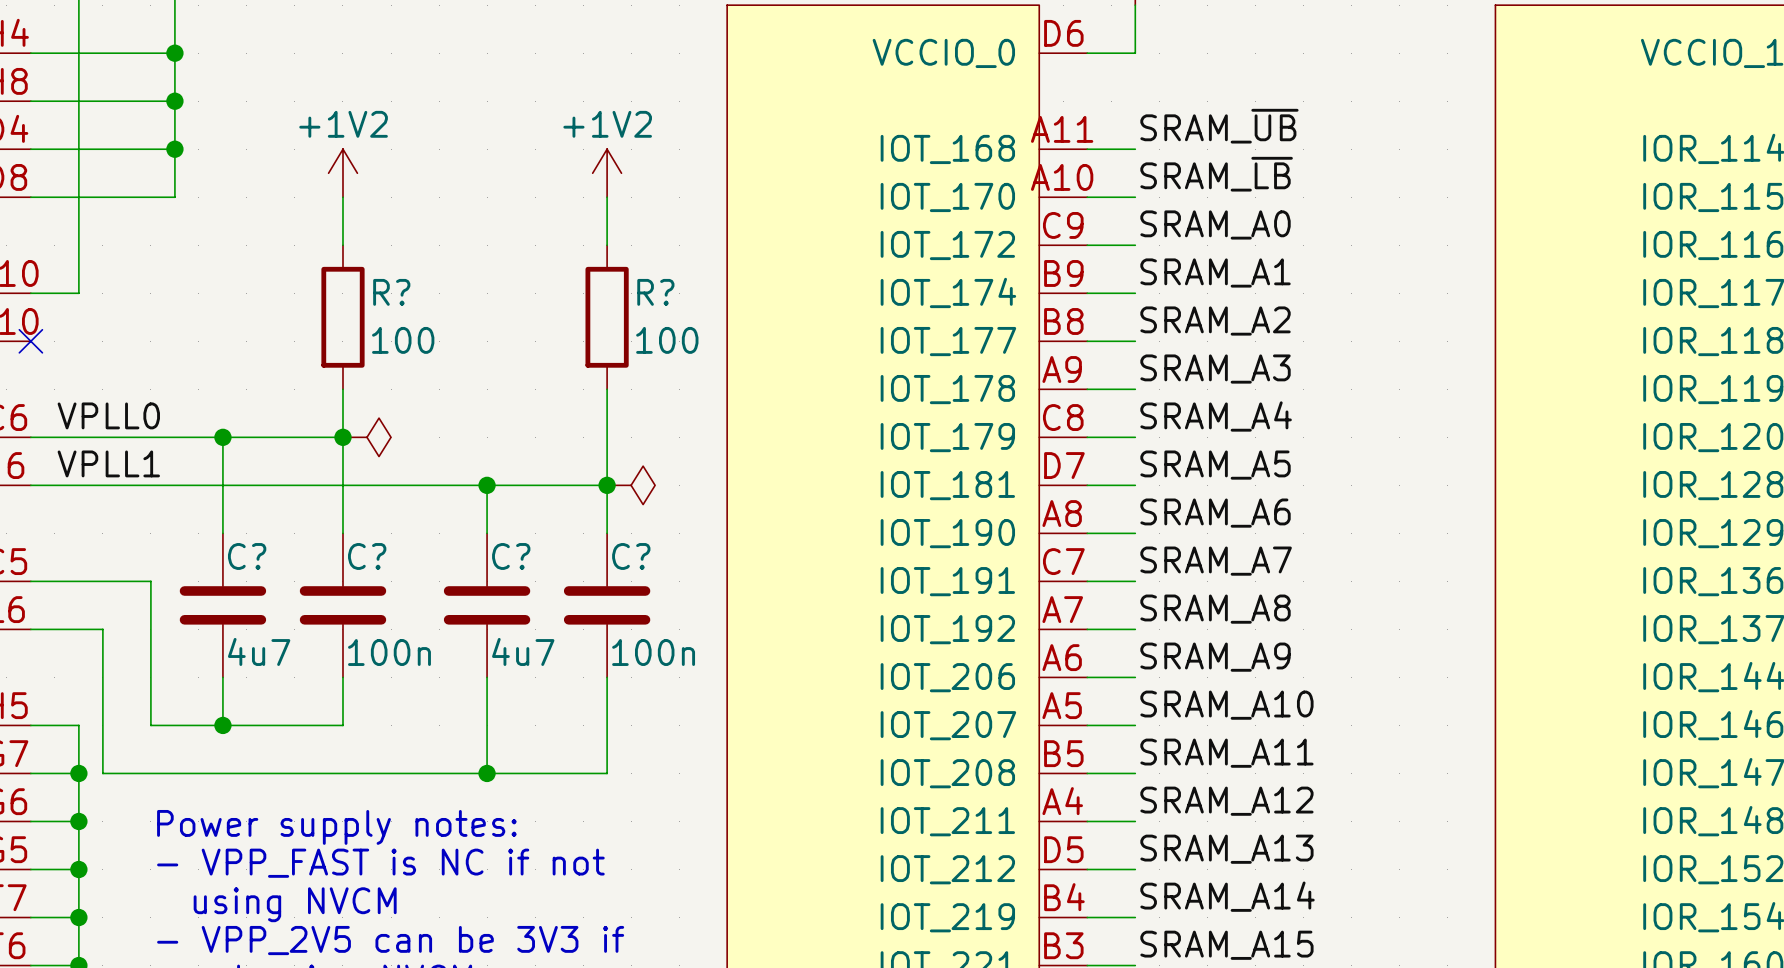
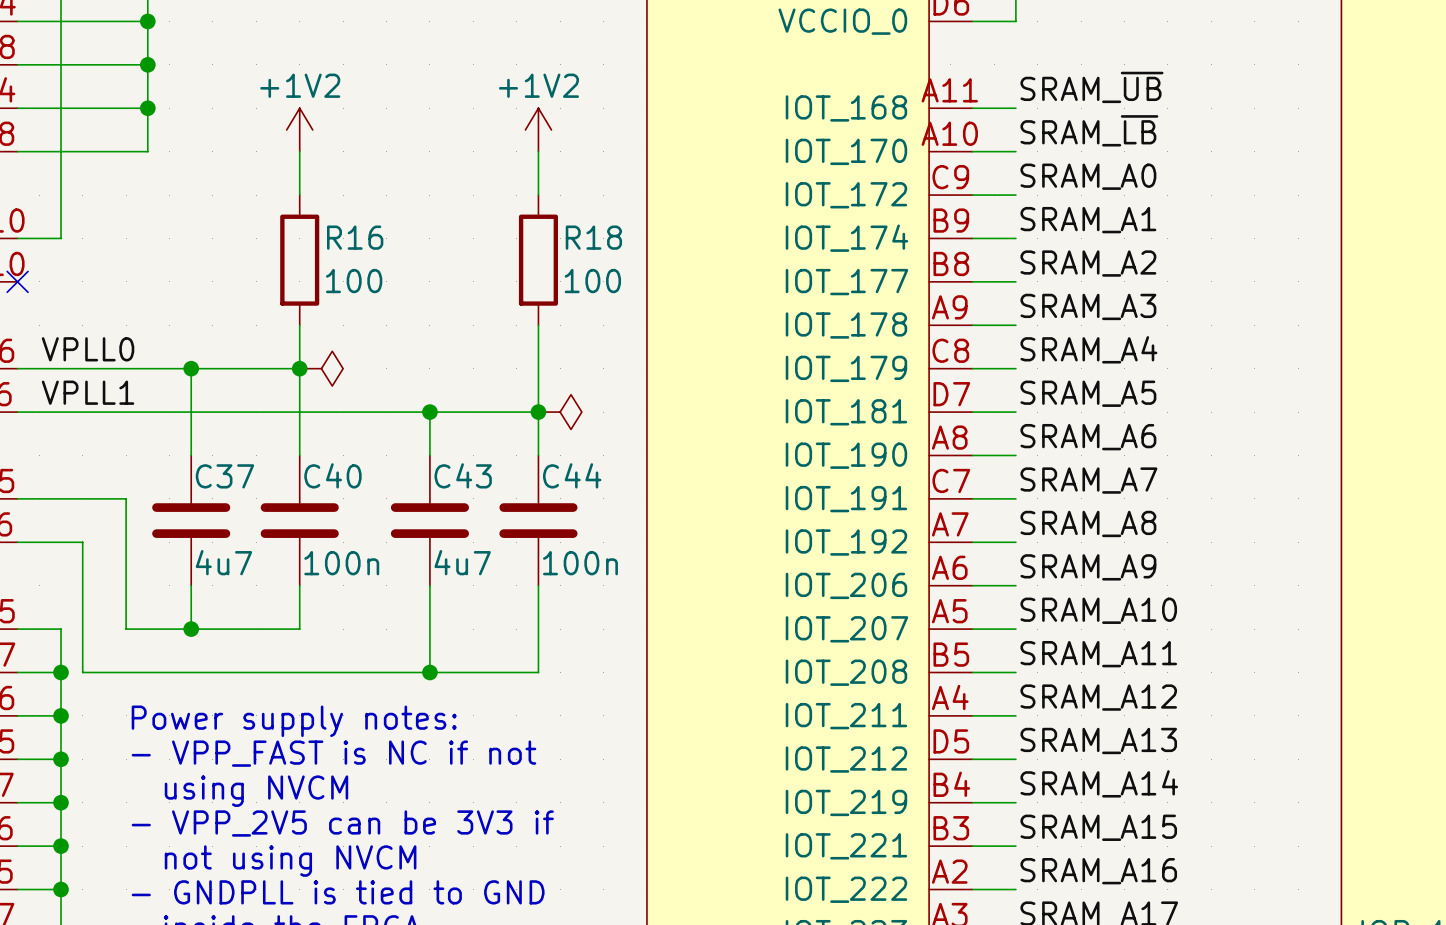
R? name: R? (391, 292) -> R16 (355, 237)
R? name: R? (655, 292) -> R18 (593, 237)
C? name: C? (247, 556) -> C37 (224, 476)
C? name: C? (367, 556) -> C40 (332, 475)
C? name: C? (511, 556) -> C43 (463, 475)
C? name: C? (631, 556) -> C44 (572, 475)

